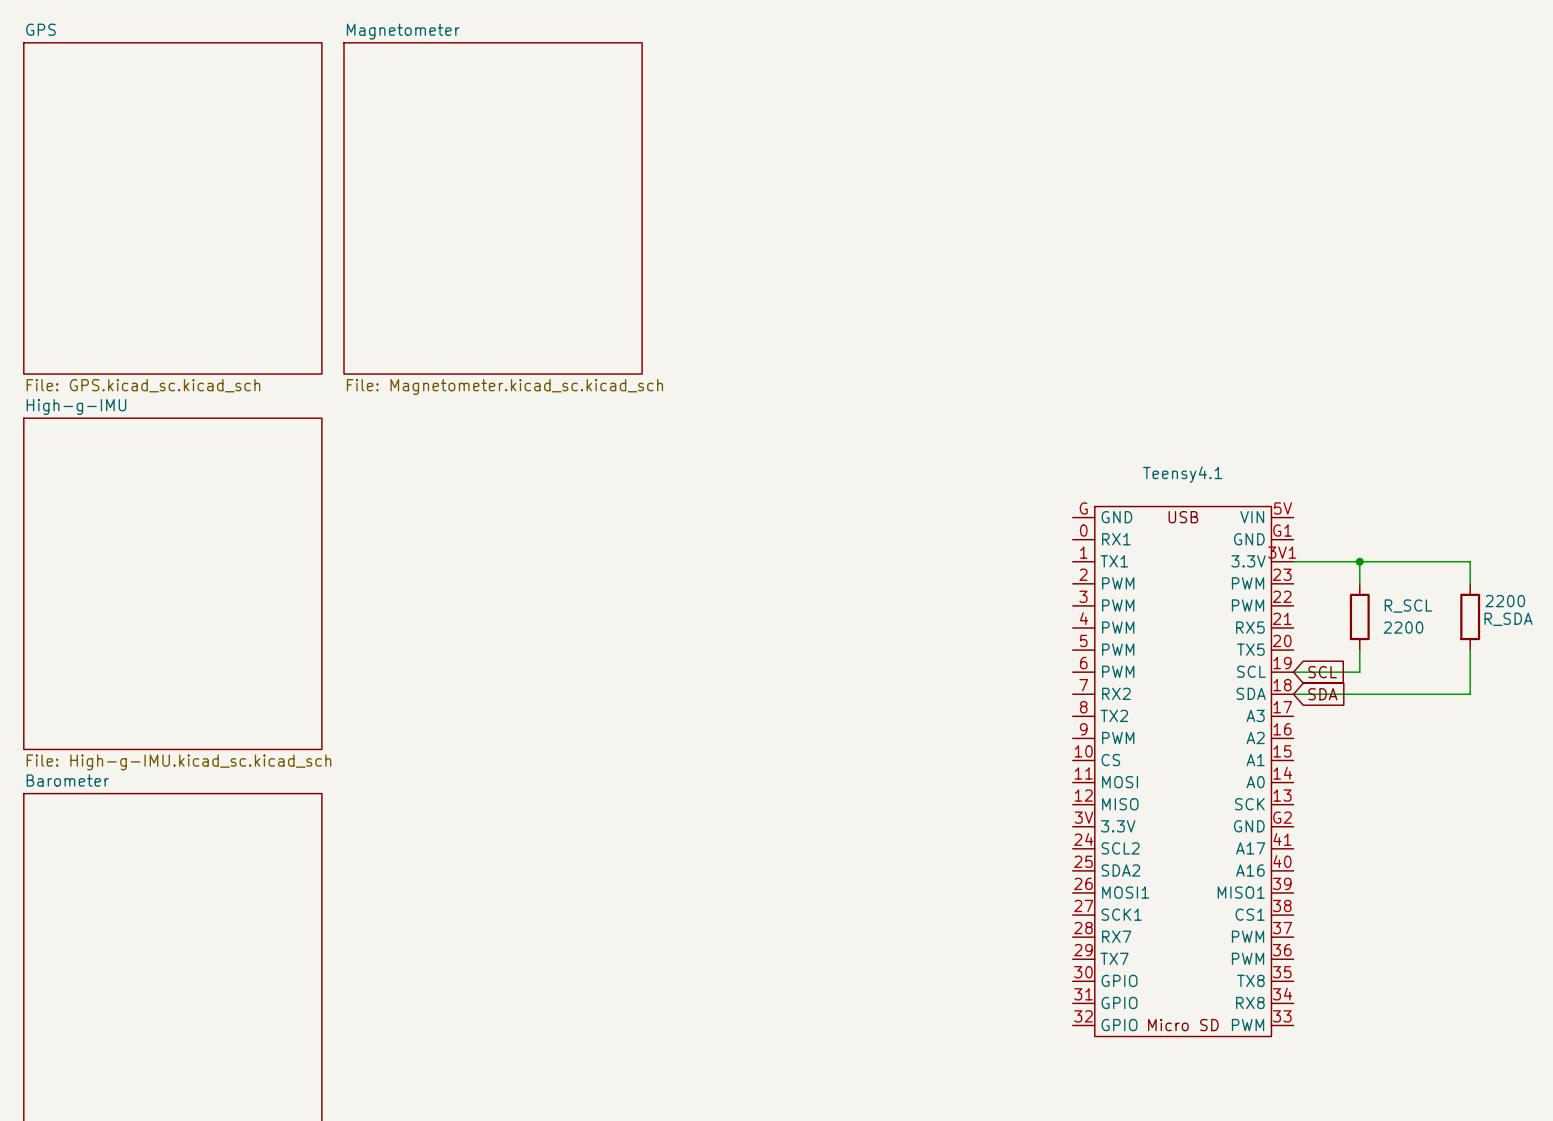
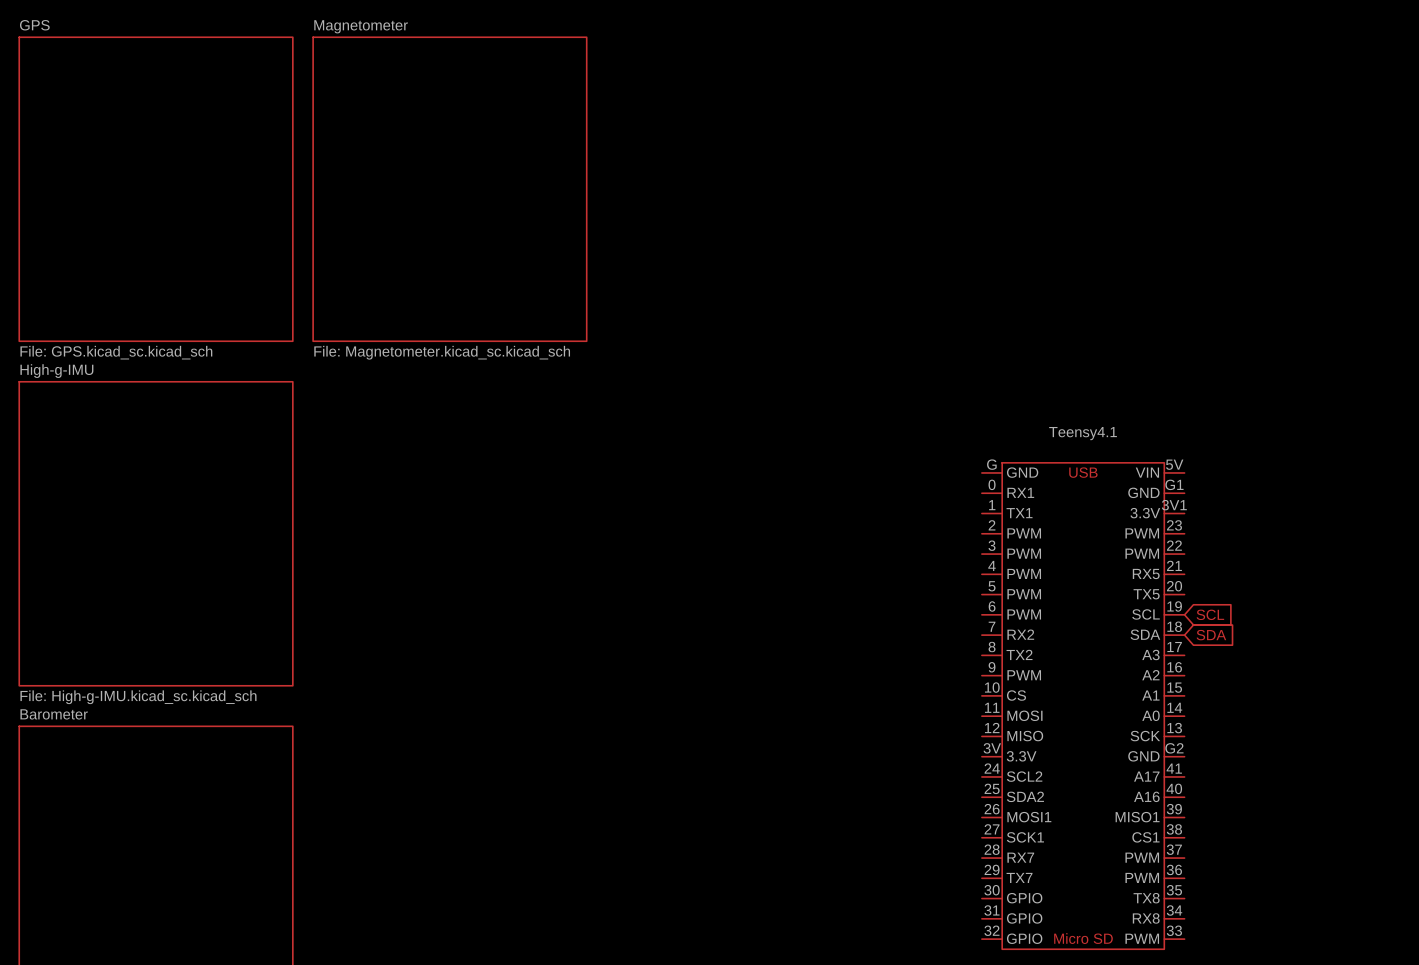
wire: (1293, 561) (1470, 561) (1470, 583) -> none
wire: (1359, 561) (1359, 583) -> none
junction: (1359, 561) -> none
R_SCL: 2200 (1359, 616) -> none
R_SDA: 2200 (1470, 616) -> none
wire: (1359, 650) (1359, 672) (1293, 672) -> none
wire: (1470, 650) (1470, 694) (1293, 694) -> none

